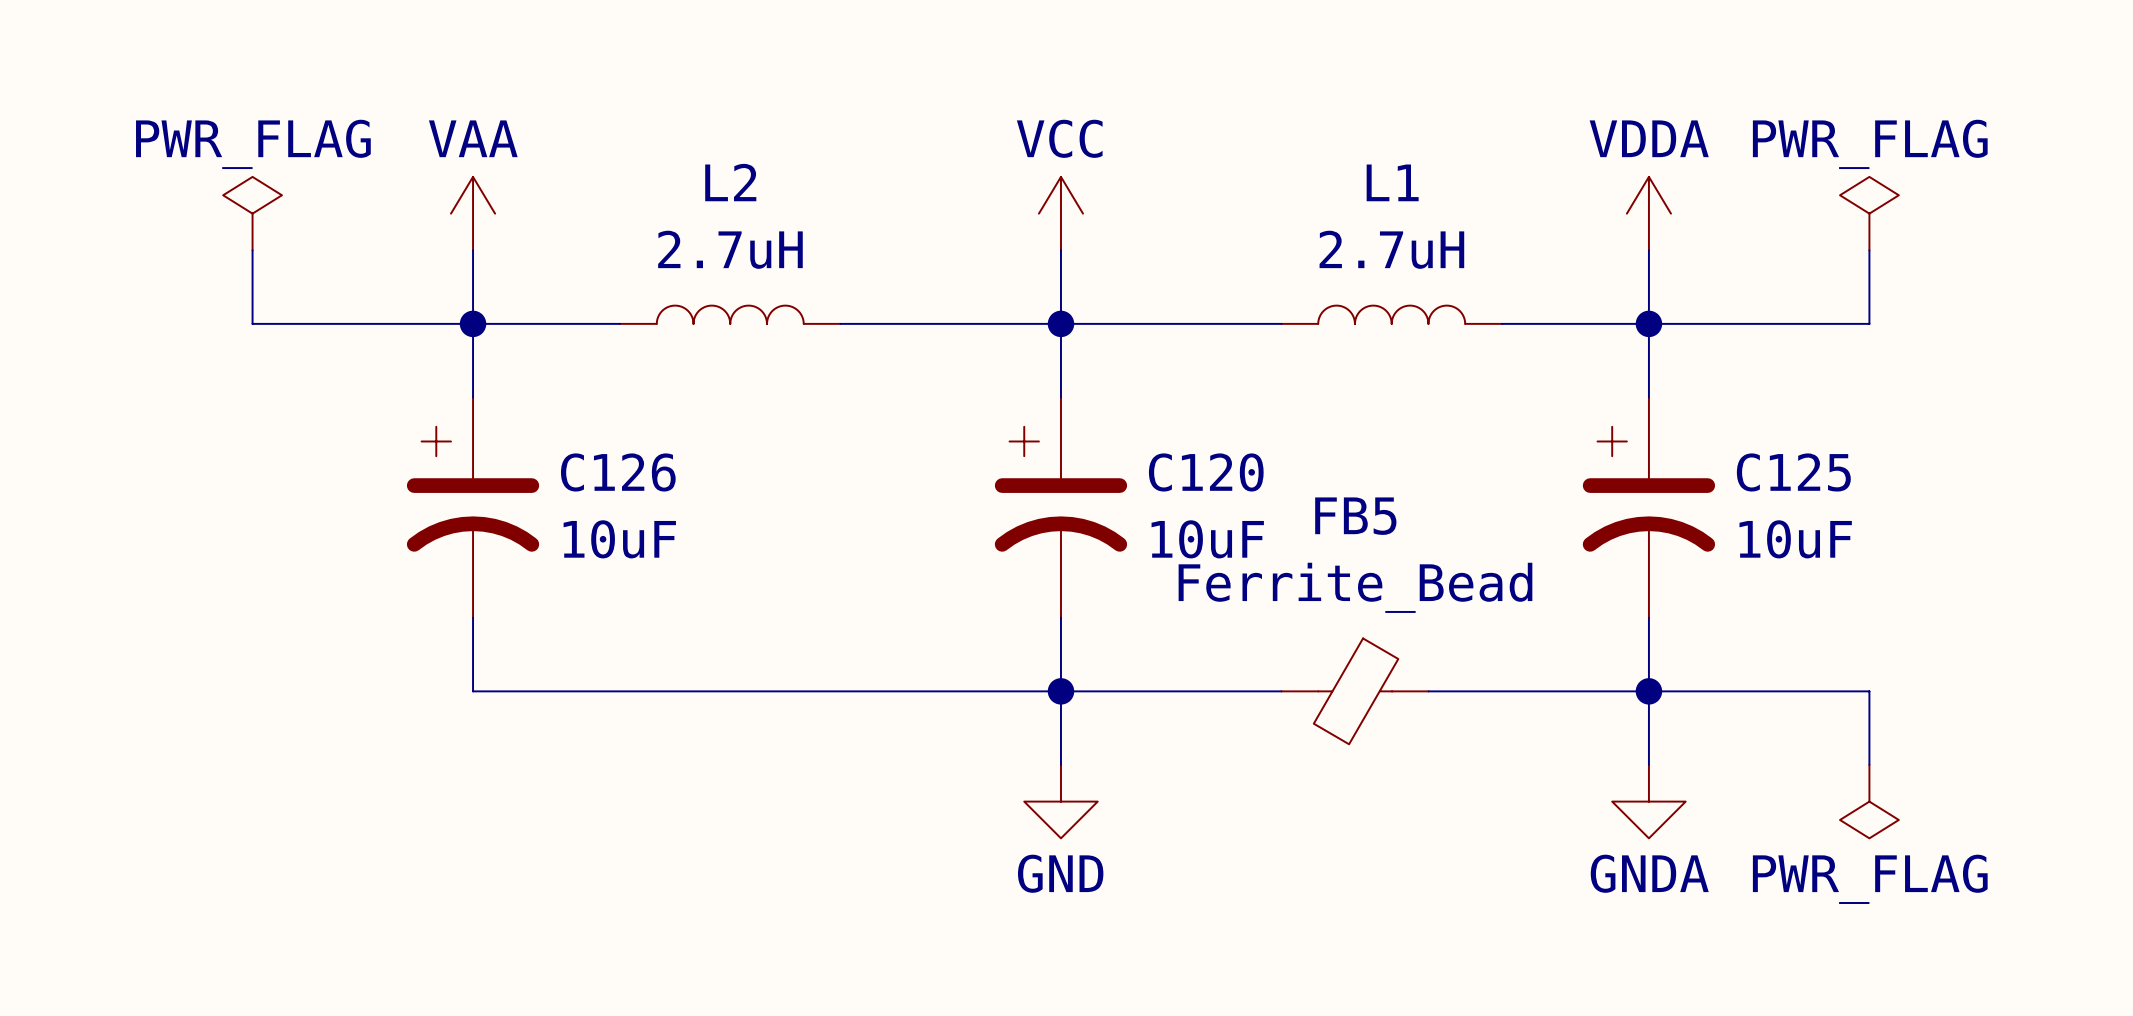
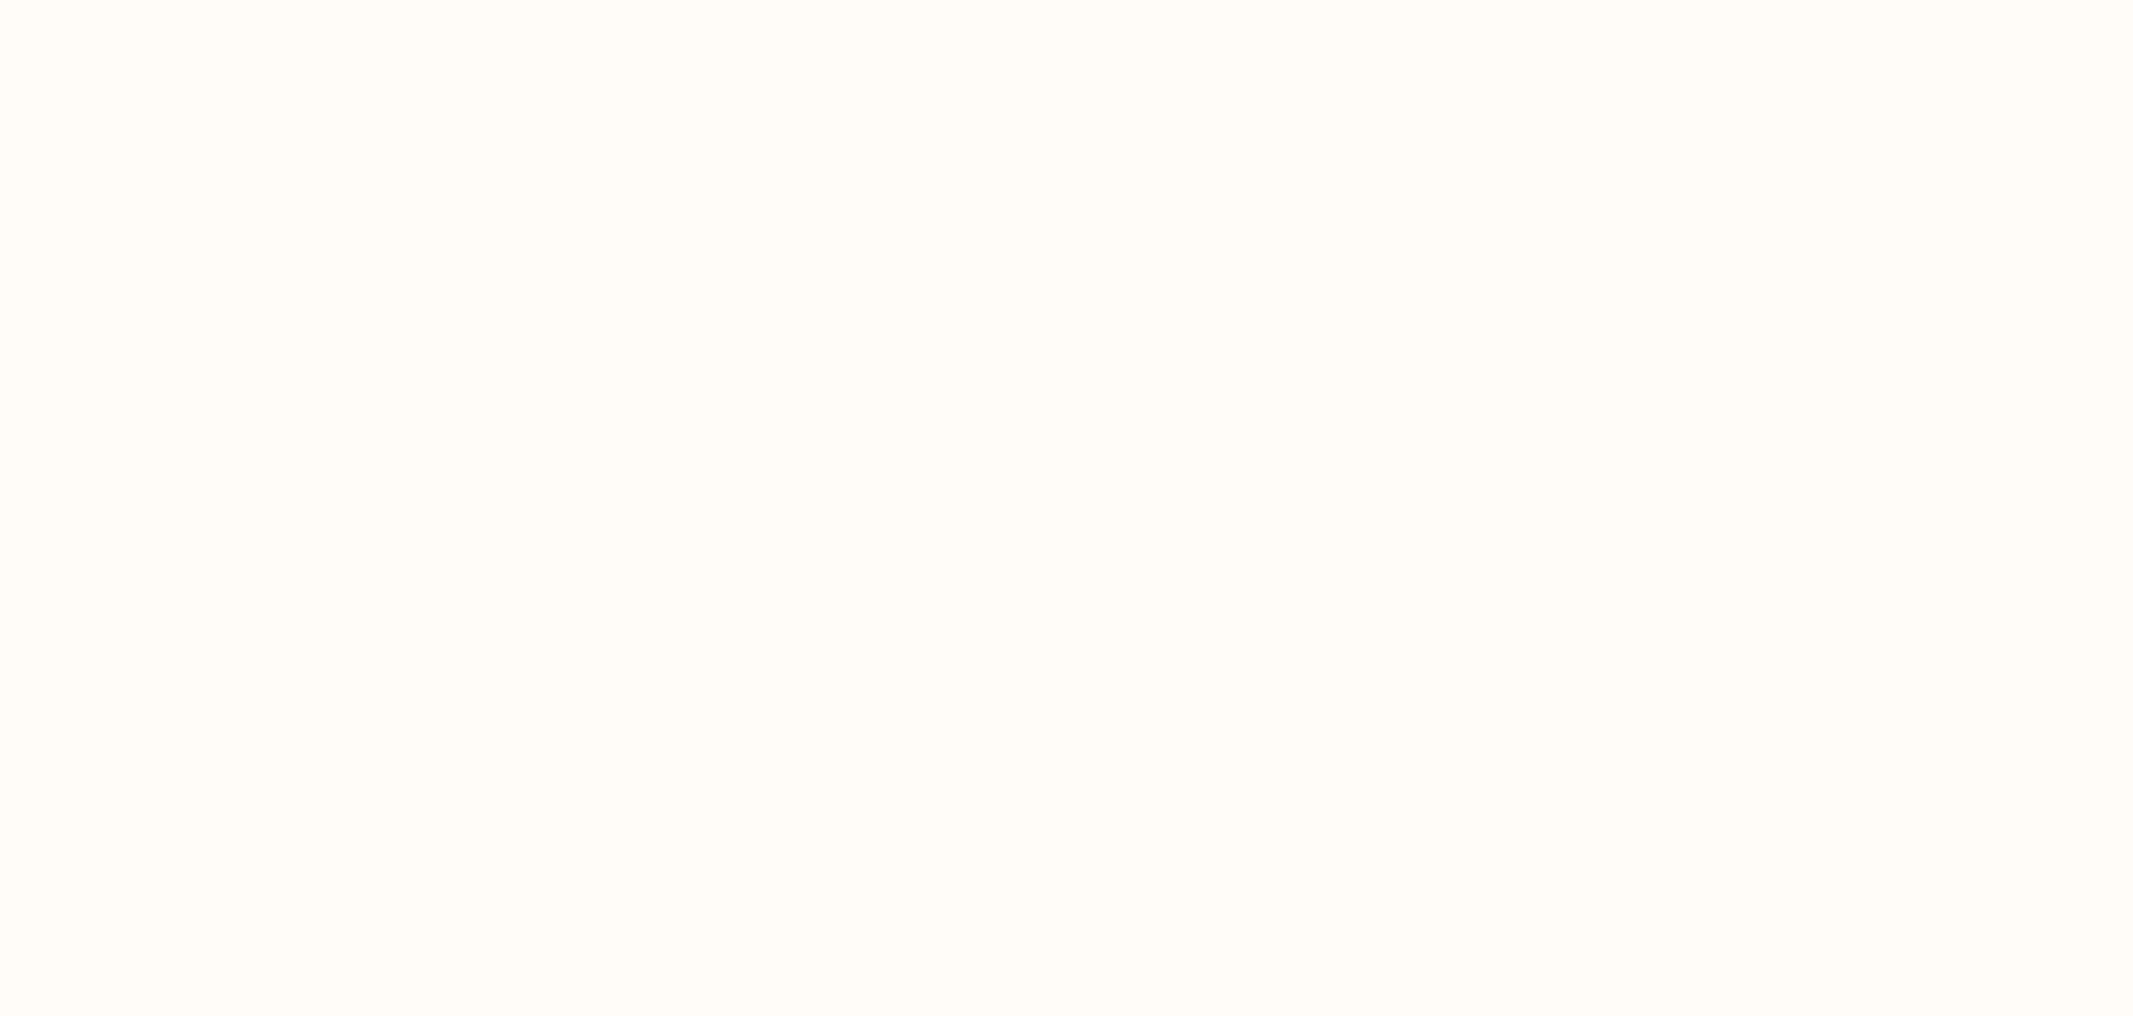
power symbol: PWR_FLAG (252, 213) -> none
power symbol: VAA (473, 213) -> none
power symbol: VCC (1060, 213) -> none
power symbol: VDDA (1648, 213) -> none
power symbol: PWR_FLAG (1869, 213) -> none
wire: (252, 250) (252, 323) (620, 323) -> none
wire: (473, 250) (473, 397) -> none
wire: (1060, 250) (1060, 397) -> none
wire: (1648, 250) (1648, 397) -> none
wire: (1869, 250) (1869, 323) (1501, 323) -> none
L2: 2.7uH (730, 314) -> none
L1: 2.7uH (1391, 314) -> none
junction: (473, 323) -> none
wire: (840, 323) (1281, 323) -> none
junction: (1060, 323) -> none
junction: (1648, 323) -> none
C126: 10uF (473, 507) -> none
C120: 10uF (1060, 507) -> none
C125: 10uF (1648, 507) -> none
wire: (473, 617) (473, 691) (1281, 691) -> none
wire: (1060, 617) (1060, 764) -> none
wire: (1648, 617) (1648, 764) -> none
junction: (1060, 691) -> none
FB5: Ferrite_Bead (1354, 691) -> none
wire: (1428, 691) (1869, 691) (1869, 764) -> none
junction: (1648, 691) -> none
power symbol: GND (1060, 801) -> none
power symbol: GNDA (1648, 801) -> none
power symbol: PWR_FLAG (1869, 801) -> none

